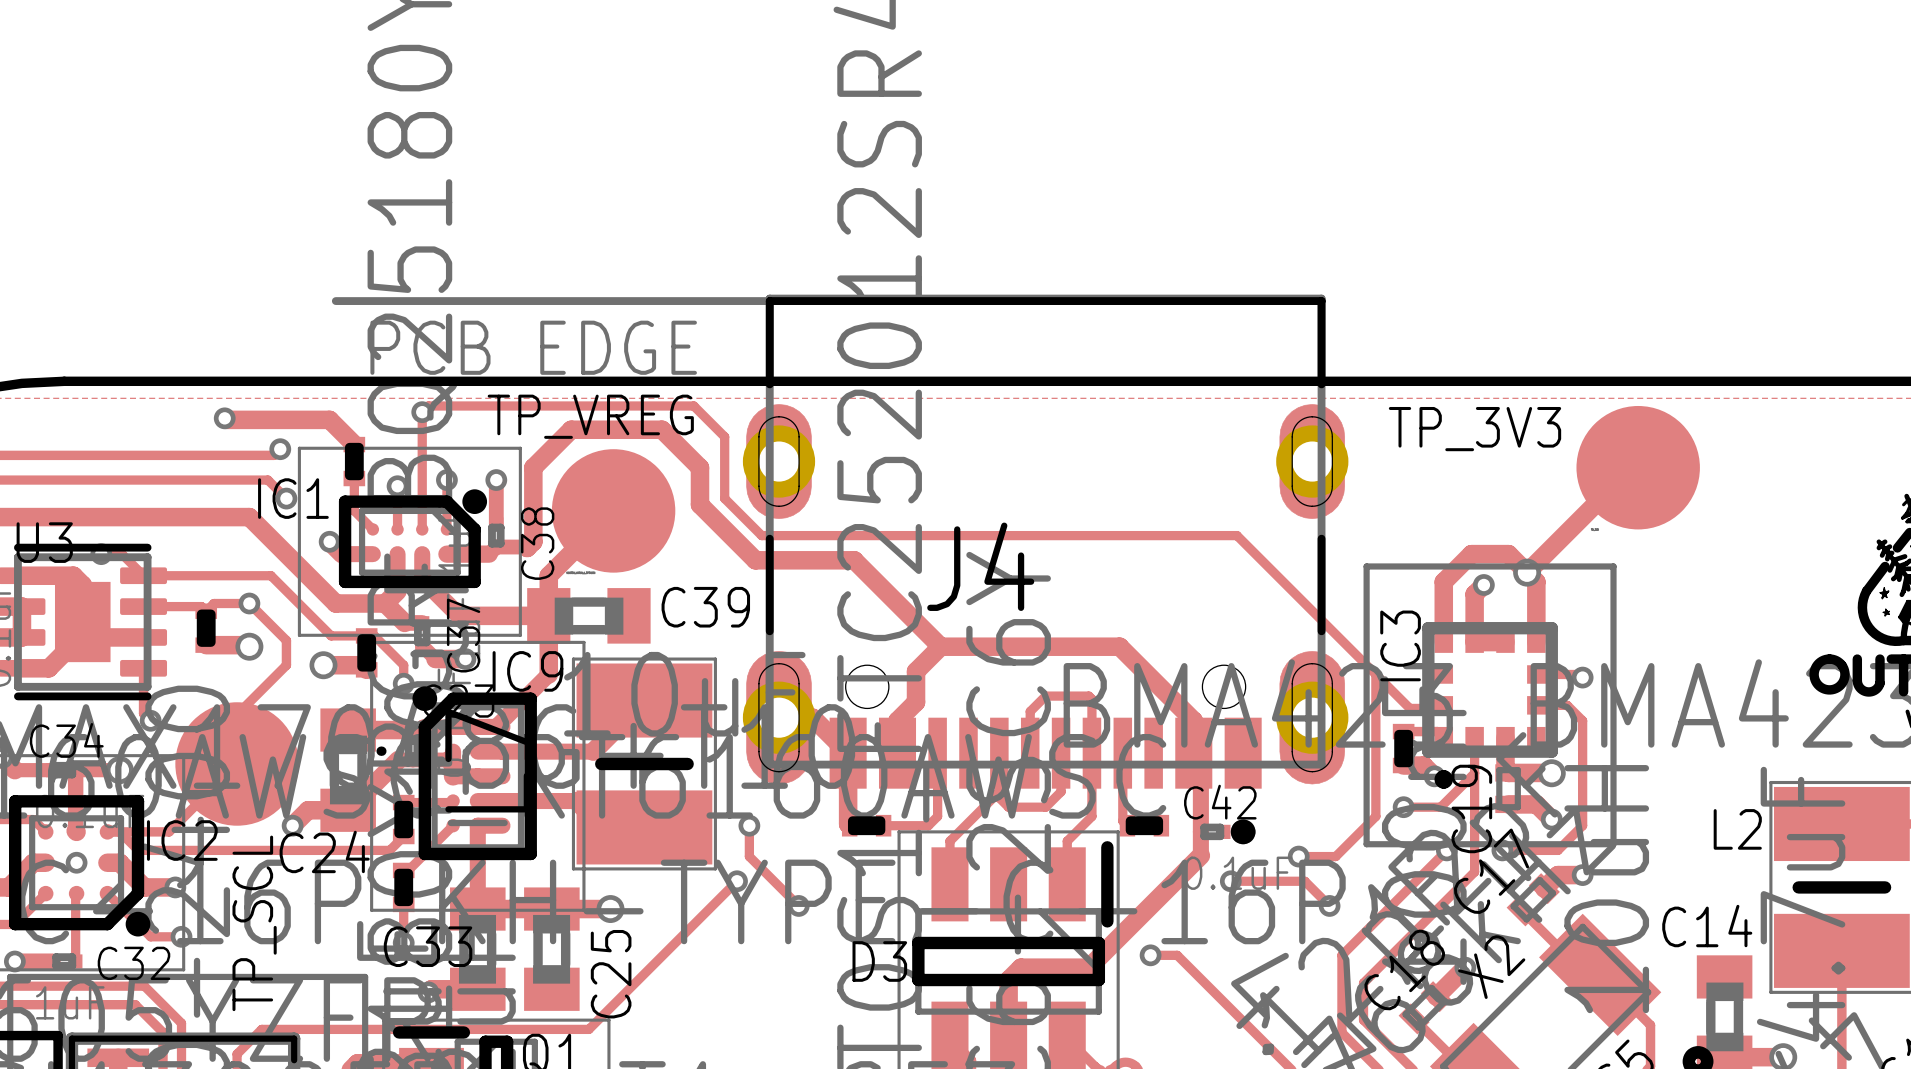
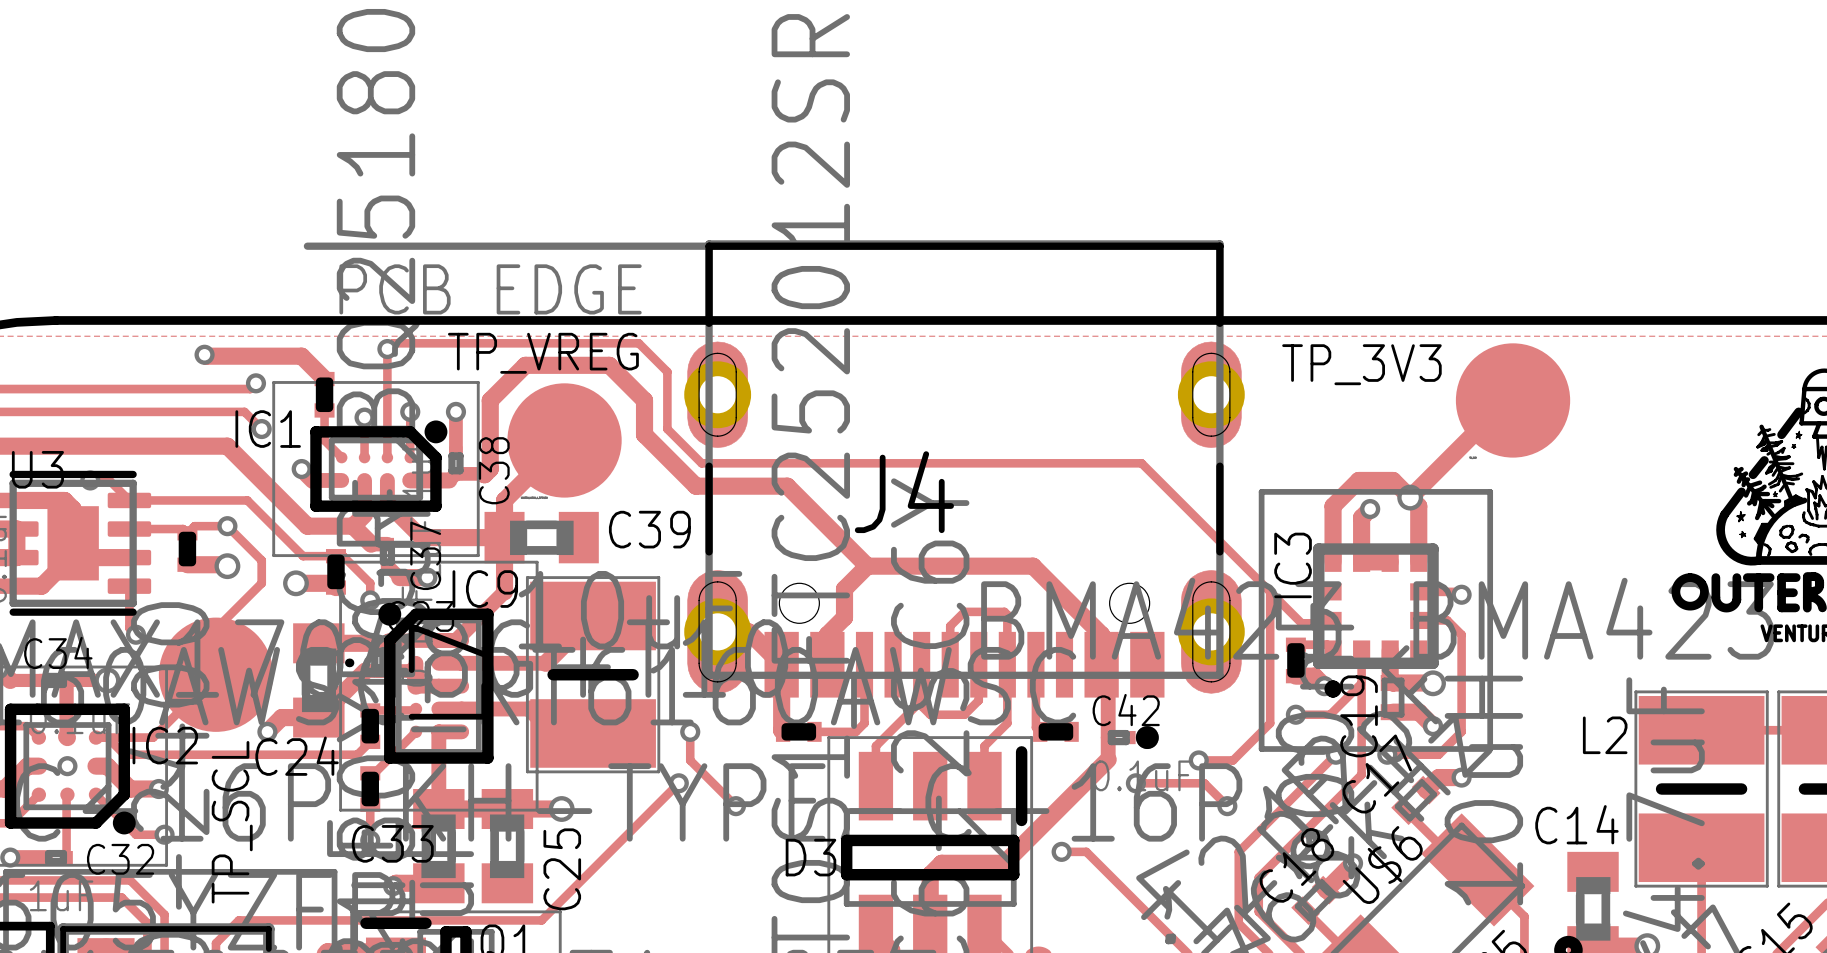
X2 name: X2 (1491, 967) -> U$6 (1382, 865)

